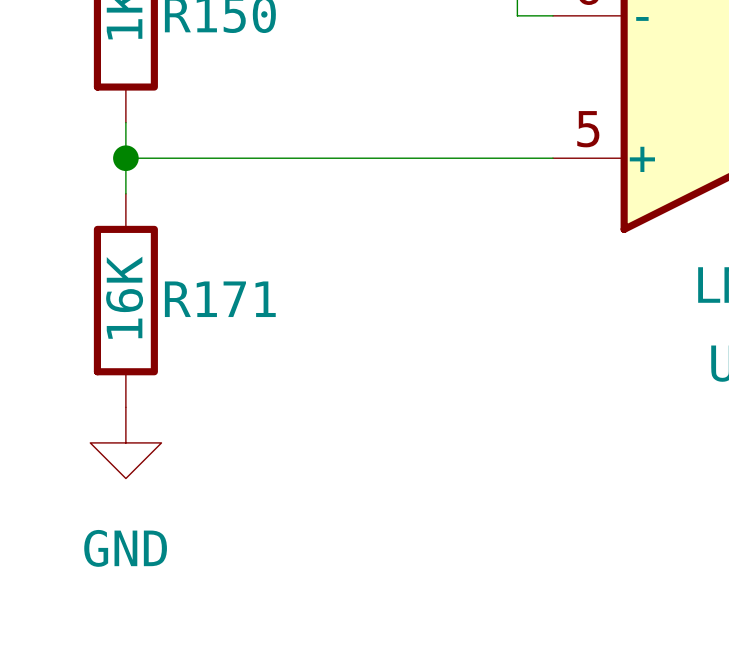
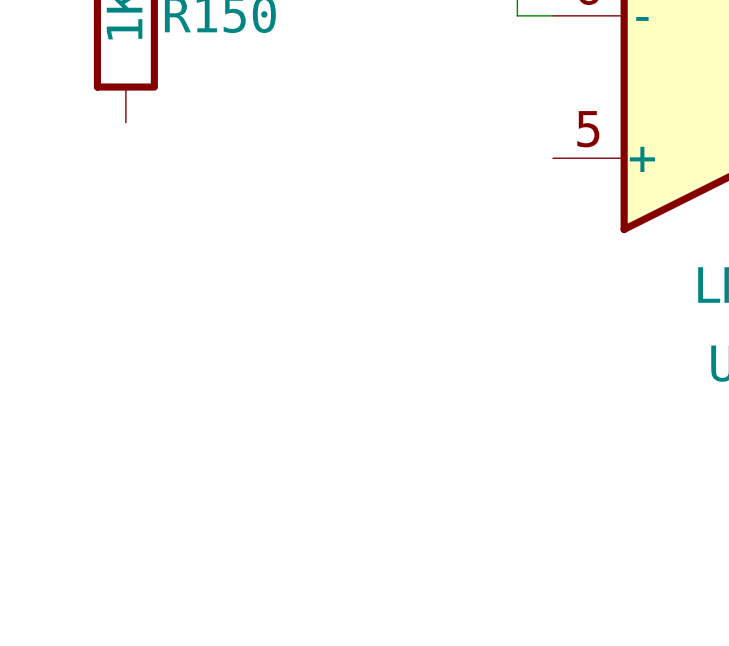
wire: (125, 122) (125, 193) -> none
wire: (125, 158) (552, 158) -> none
junction: (125, 158) -> none
R171: 16K (125, 300) -> none
power symbol: GND (125, 442) -> none

